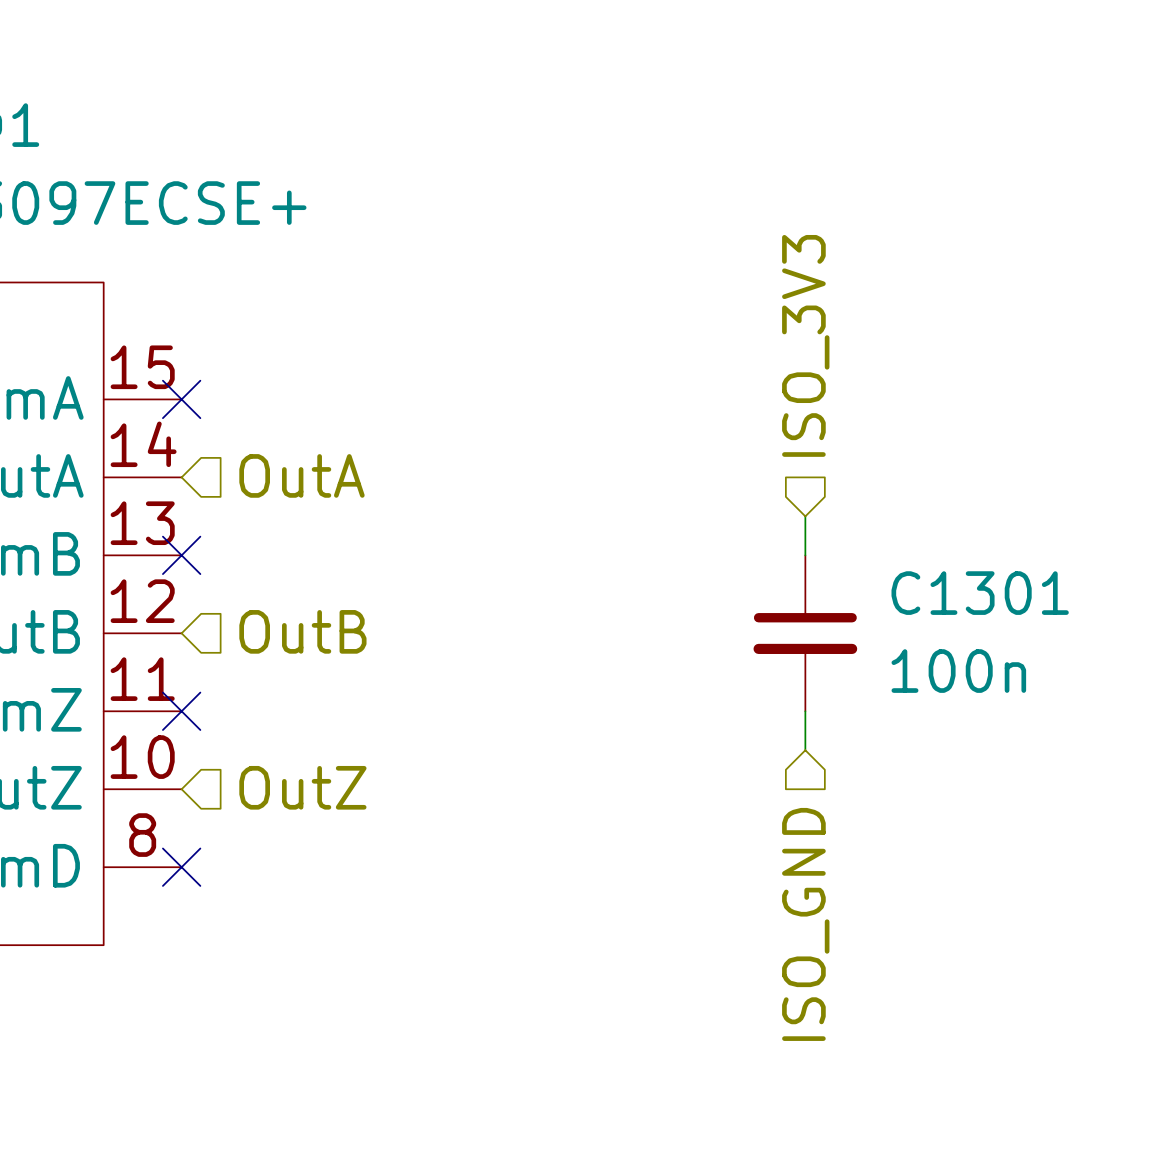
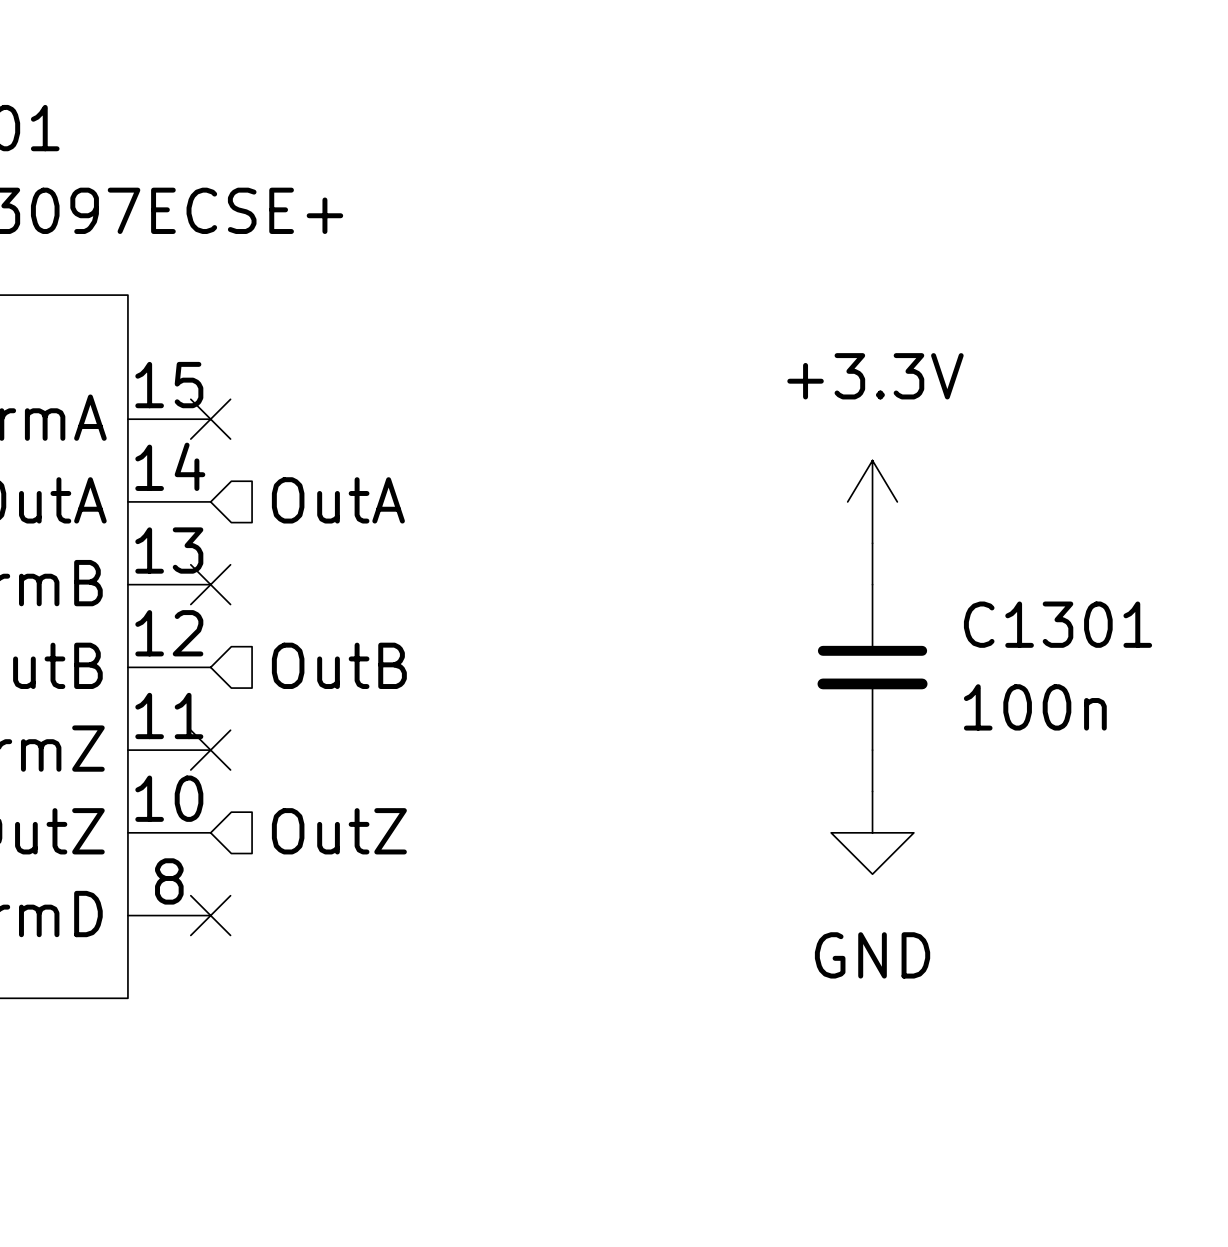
hierarchical label: ISO_3V3 (805, 345) -> none
power symbol: none -> +3.3V (872, 501)
power symbol: none -> GND (872, 832)
hierarchical label: ISO_GND (805, 924) -> none

